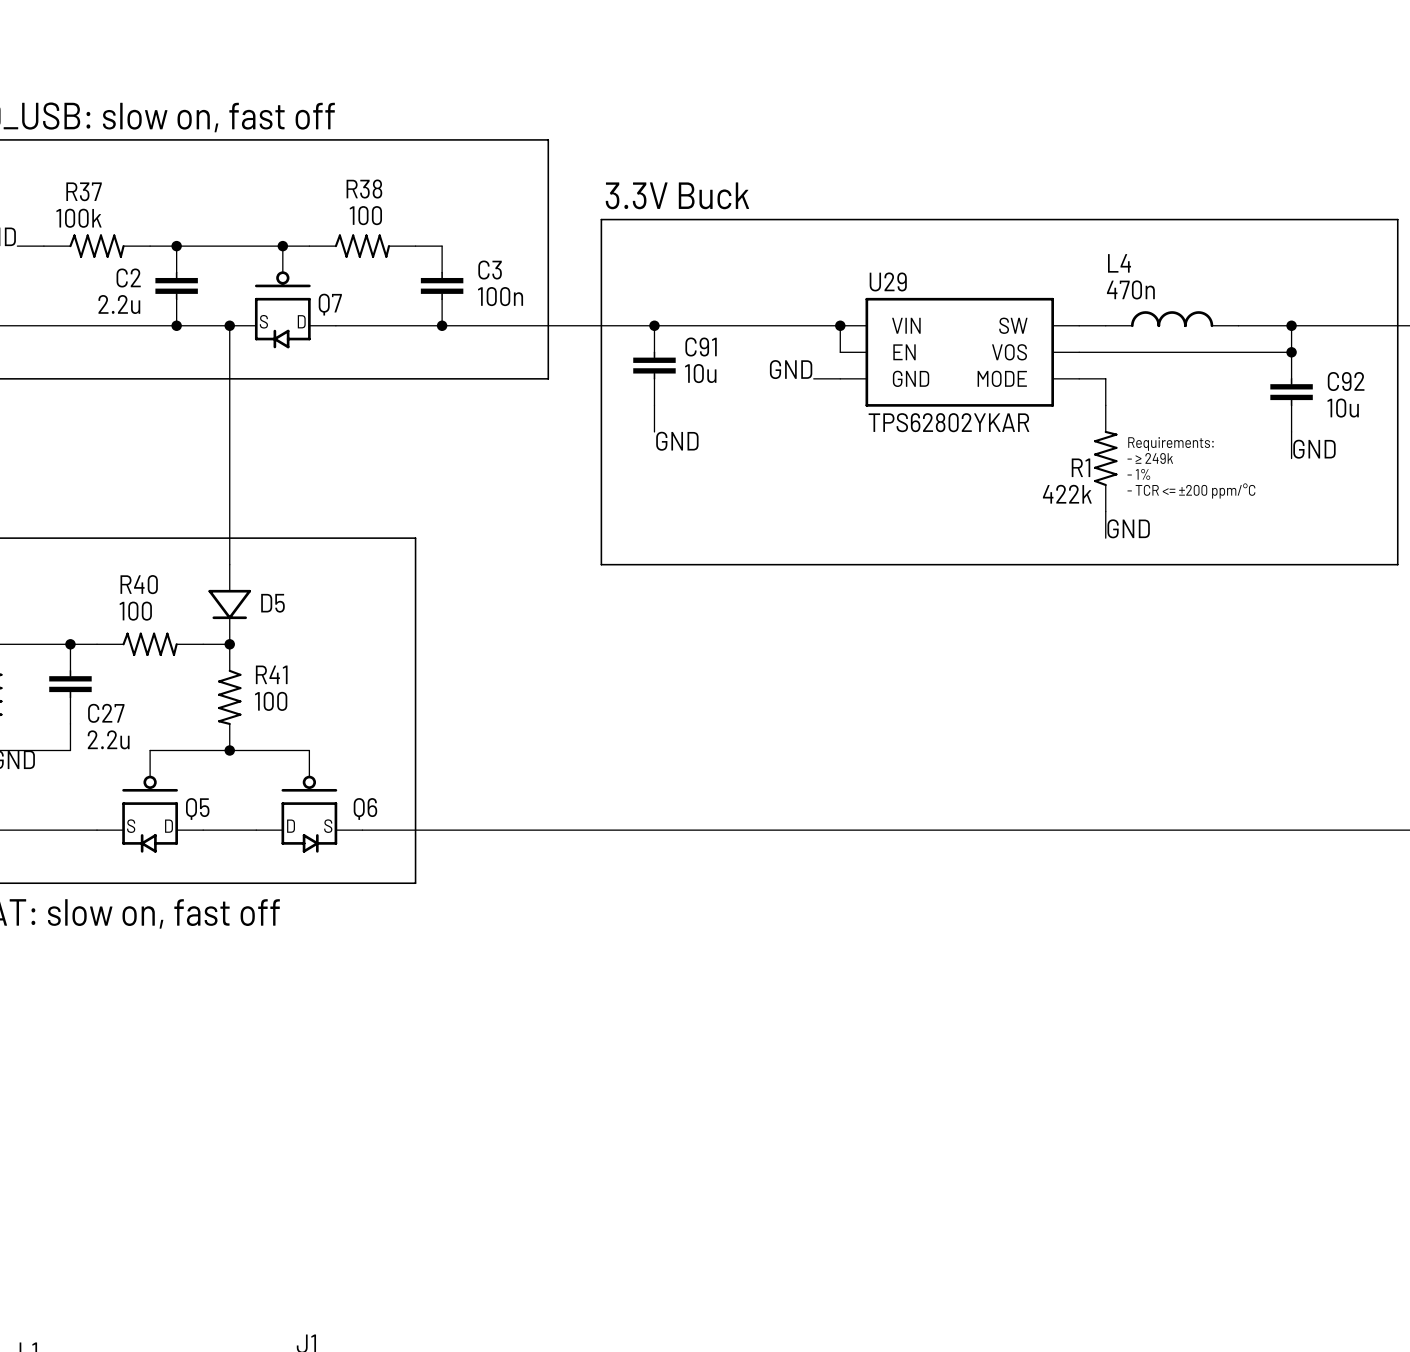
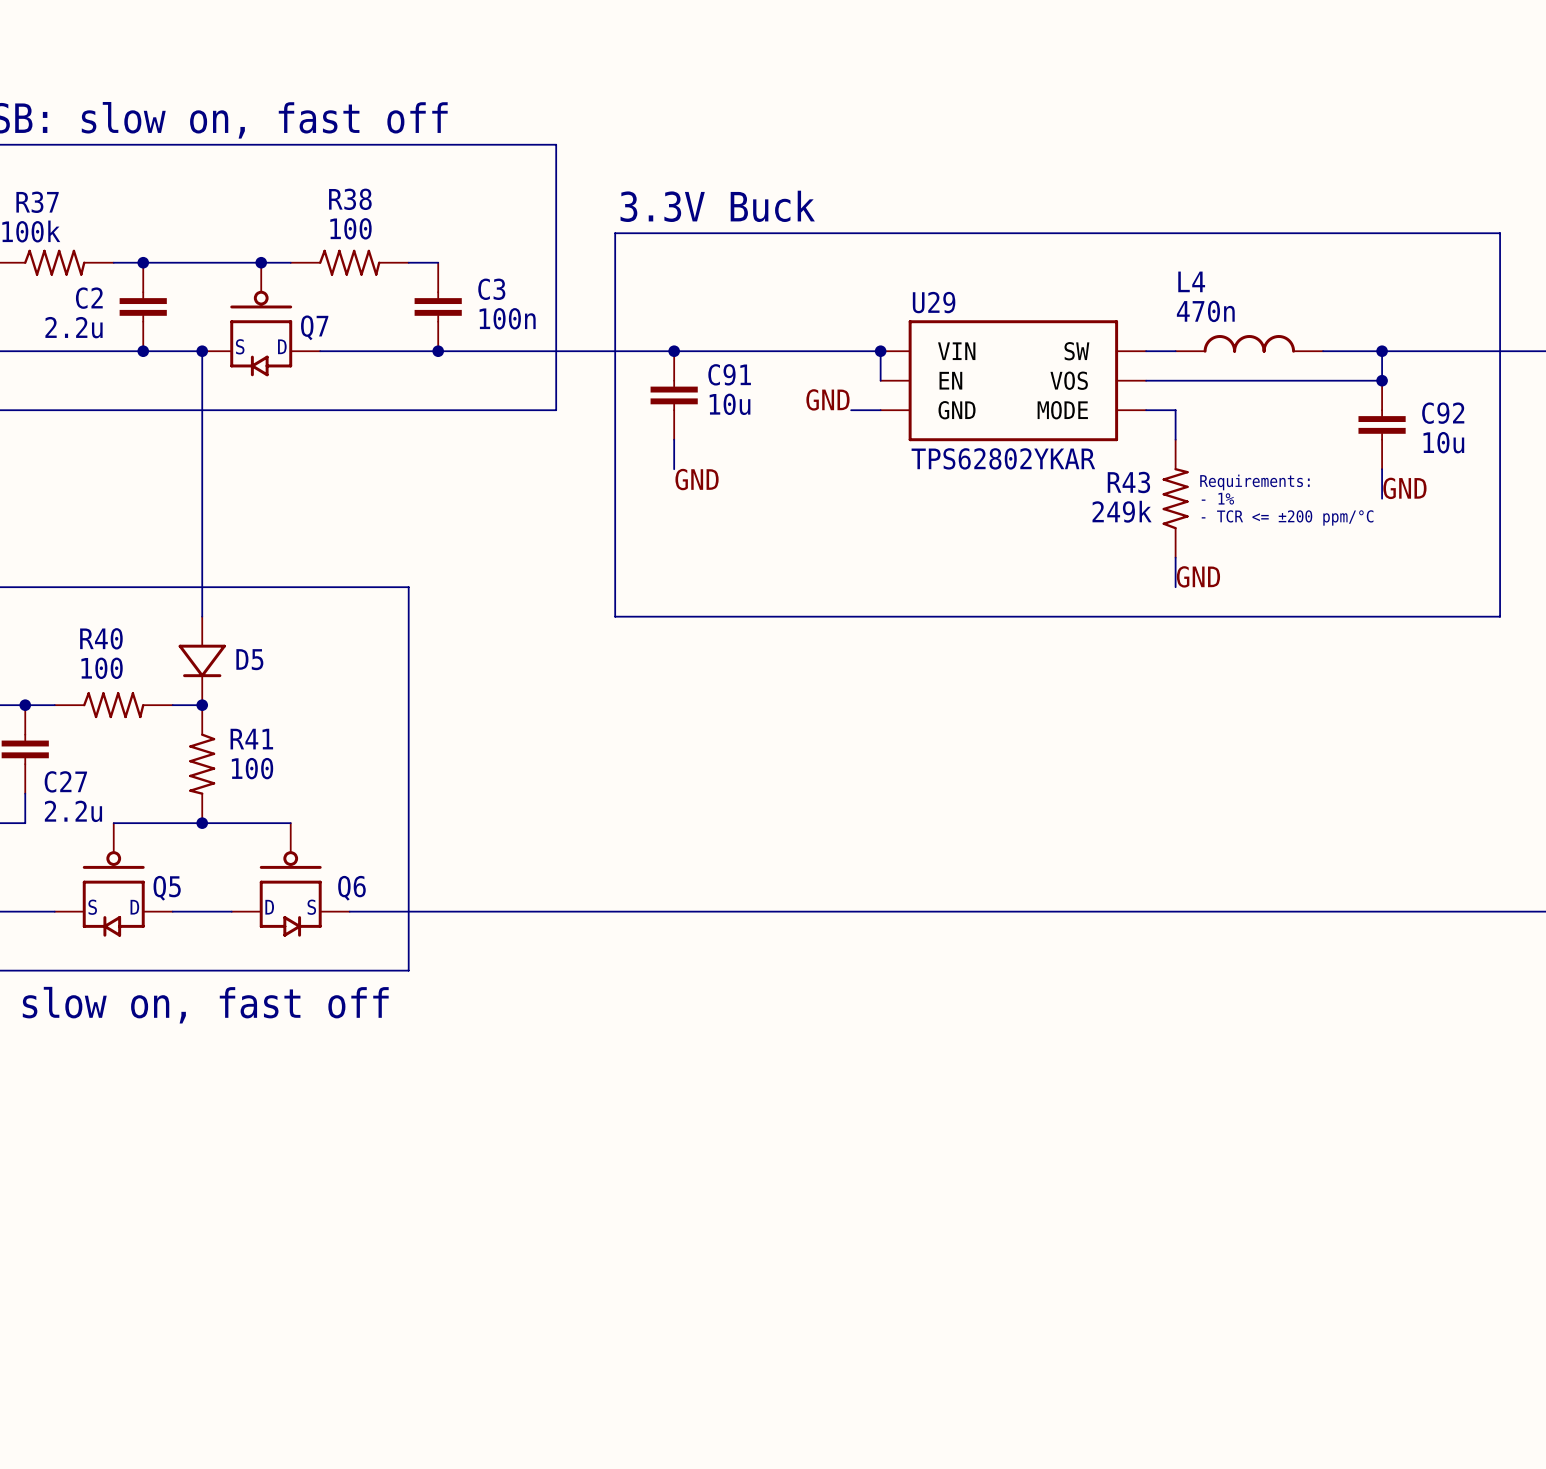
text: - ≥ 249k (1150, 458) -> - 1% (1217, 498)
R1 name: R1 (1081, 467) -> R43 (1128, 482)
text: - 1% (1138, 474) -> - TCR <= ±200 ppm/°C (1287, 517)
text: - TCR <= ±200 ppm/°C (1191, 490) -> none
R1 value: 422k (1067, 494) -> 249k (1122, 511)

